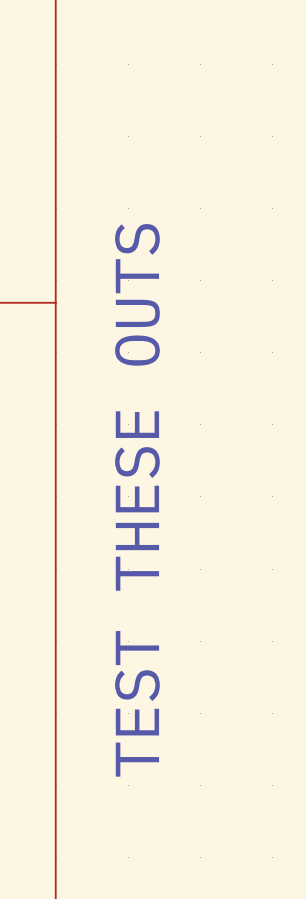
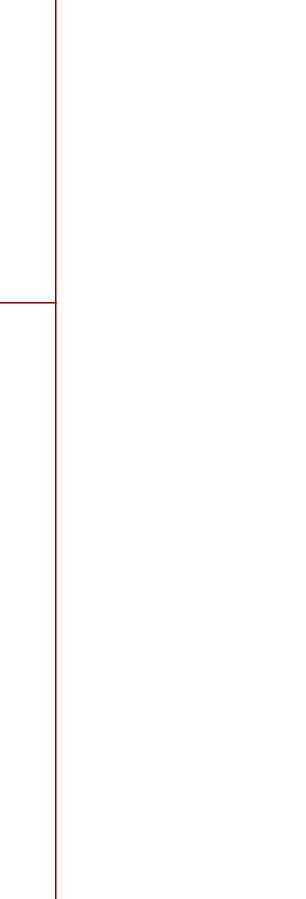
text: TEST THESE OUTS (137, 500) -> none

